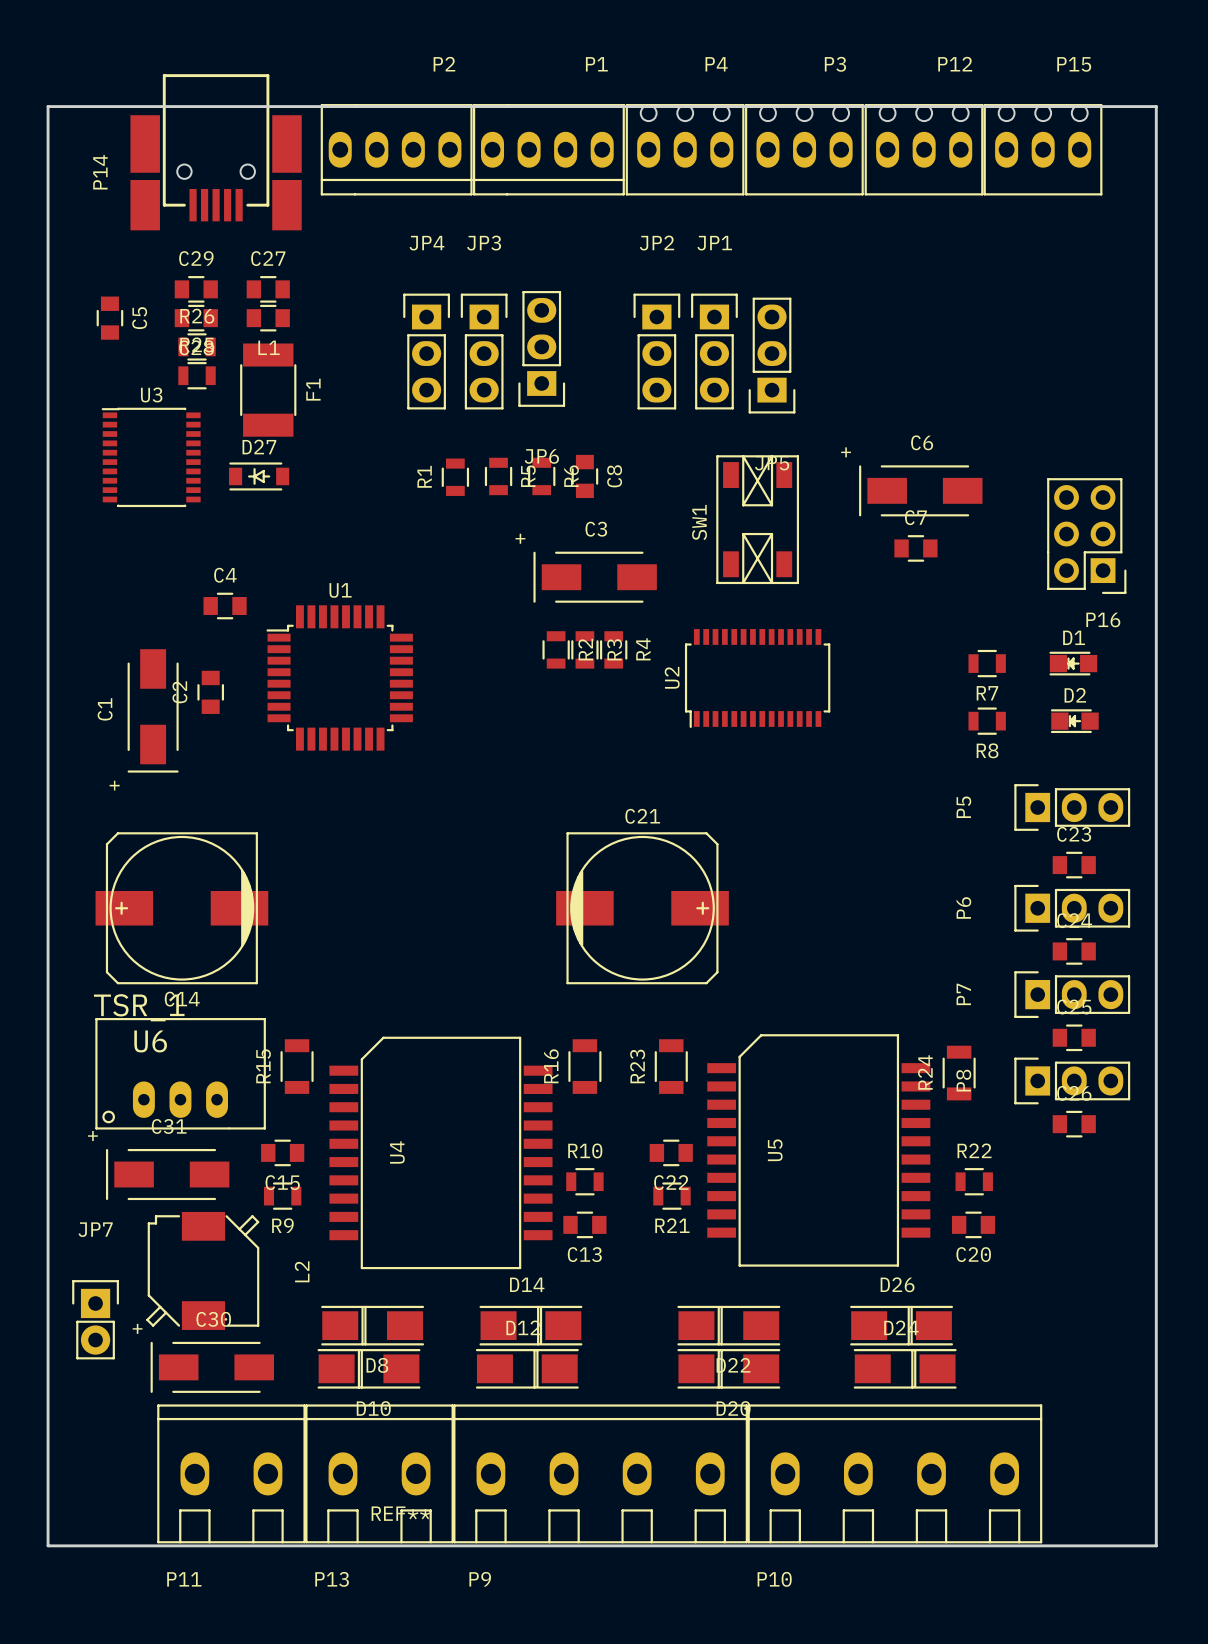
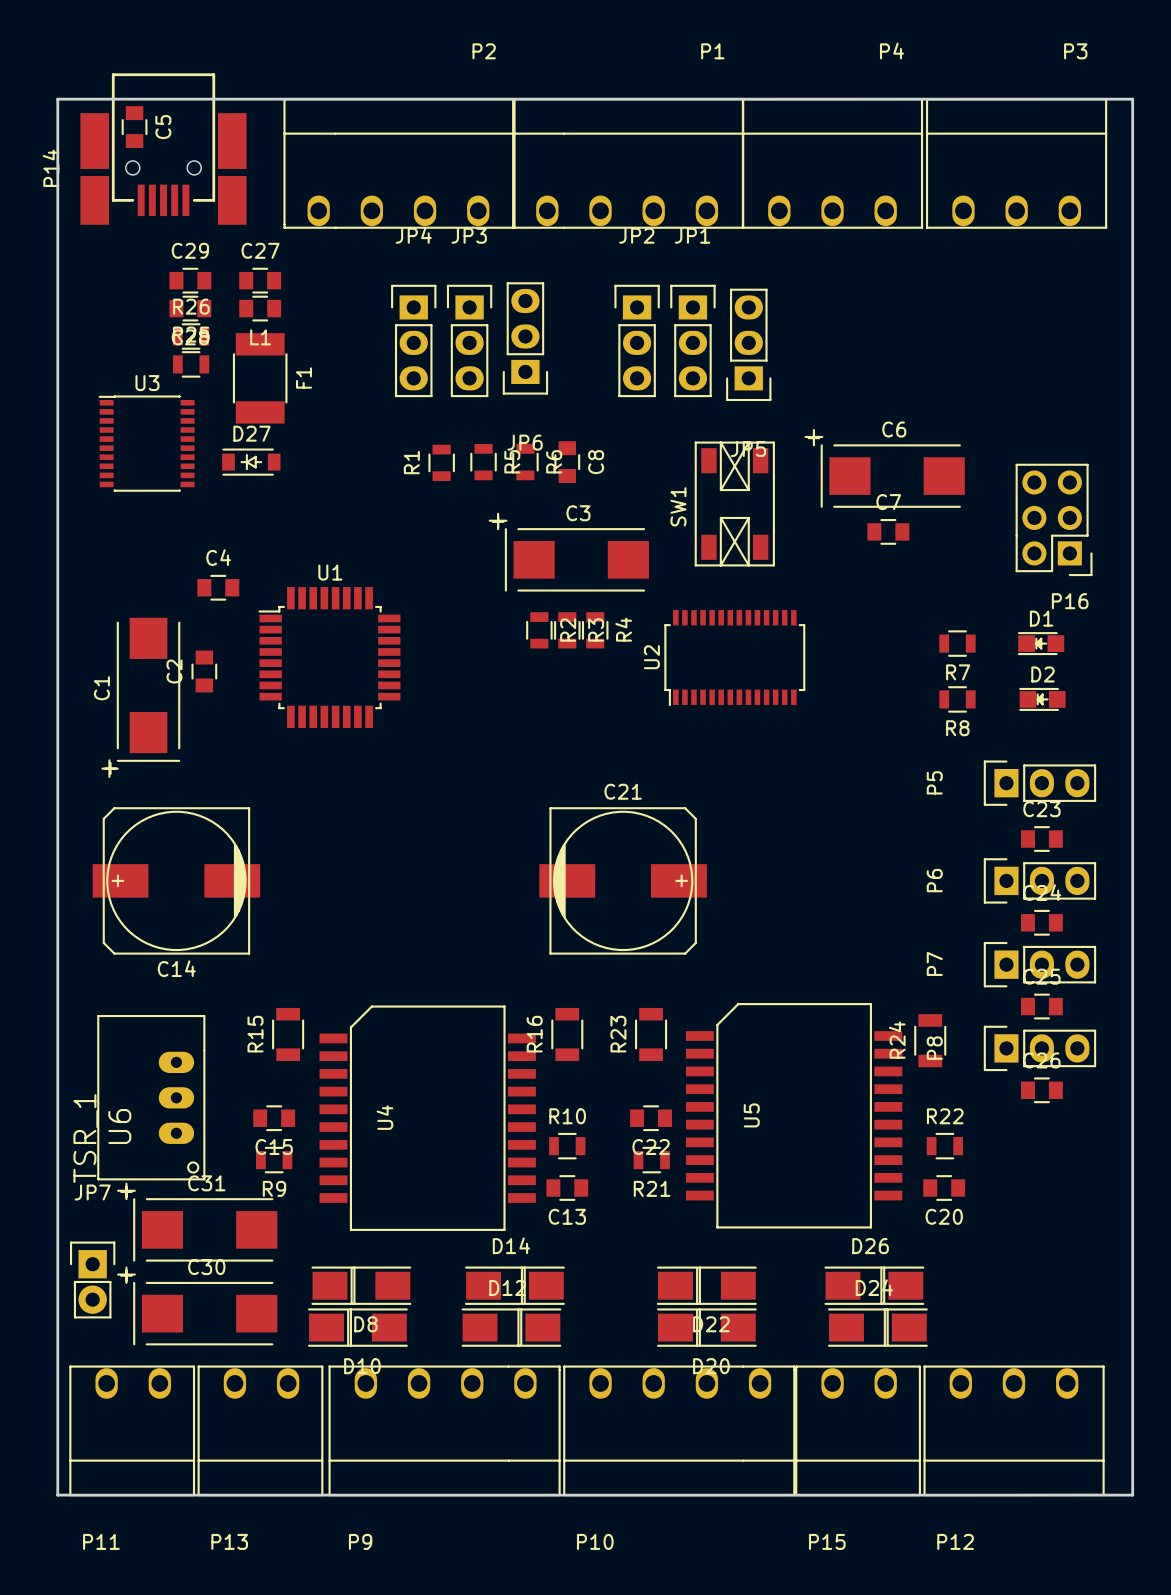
P2 name position: P2 (444, 64) -> P2 (484, 51)
P1 name position: P1 (596, 64) -> P1 (712, 51)
P4 name position: P4 (716, 64) -> P4 (891, 50)
P3 name position: P3 (835, 64) -> P3 (1075, 51)
P12 name position: P12 (955, 64) -> P12 (955, 1541)
P15 name position: P15 (1074, 64) -> P15 (827, 1541)
drawing: none -> [56, 97, 1135, 1497]
P2 footprint: [320, 104, 473, 196] -> [283, 98, 516, 229]
P1 footprint: [472, 104, 625, 196] -> [512, 98, 745, 229]
P4 footprint: [625, 104, 745, 196] -> [741, 98, 924, 229]
P3 footprint: [745, 104, 864, 196] -> [925, 98, 1108, 229]
P12 footprint: [864, 104, 984, 196] -> [923, 1365, 1105, 1497]
P15 footprint: [983, 104, 1103, 196] -> [795, 1365, 921, 1497]
P14 position: (216, 152) -> (163, 149)
C5 position: (109, 318) -> (134, 127)
C6 footprint: [859, 465, 983, 517] -> [804, 428, 965, 508]
C3 footprint: [533, 551, 657, 603] -> [488, 512, 649, 592]
C1 footprint: [127, 649, 179, 773] -> [101, 617, 181, 779]
REF**: (602, 826) -> none
U6 rotation: 0° (180, 1073) -> 90° counterclockwise (151, 1097)
C31 footprint: [105, 1148, 230, 1201] -> [117, 1182, 278, 1262]
L2: (202, 1270) -> none
C30 footprint: [150, 1341, 275, 1393] -> [117, 1266, 278, 1346]
P11 footprint: [157, 1404, 306, 1544] -> [69, 1365, 196, 1497]
P13 footprint: [305, 1404, 454, 1544] -> [197, 1365, 324, 1497]
P9 footprint: [453, 1404, 748, 1544] -> [328, 1365, 561, 1497]
P10 footprint: [747, 1404, 1043, 1544] -> [563, 1365, 796, 1497]
P9 name position: P9 (480, 1579) -> P9 (360, 1541)
P10 name position: P10 (774, 1579) -> P10 (595, 1541)

